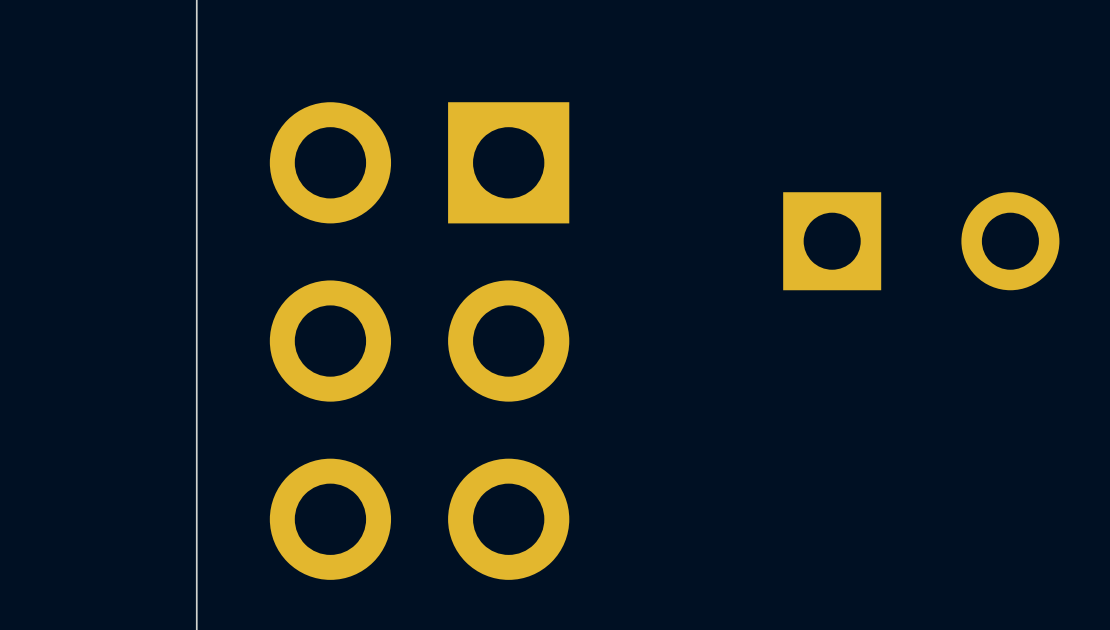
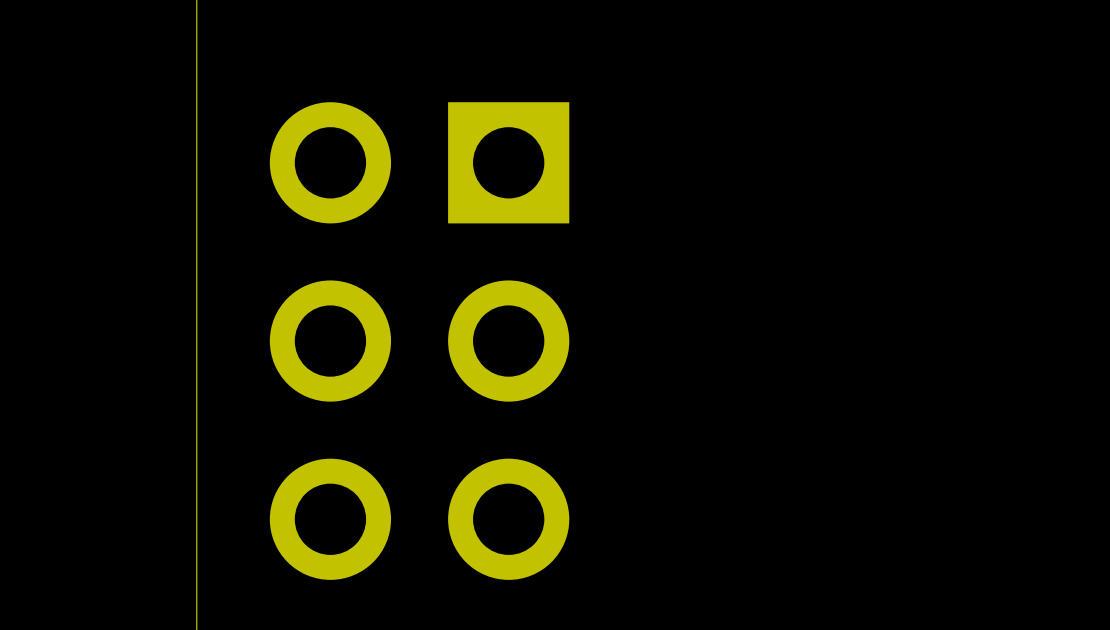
part: (921, 241) -> none

